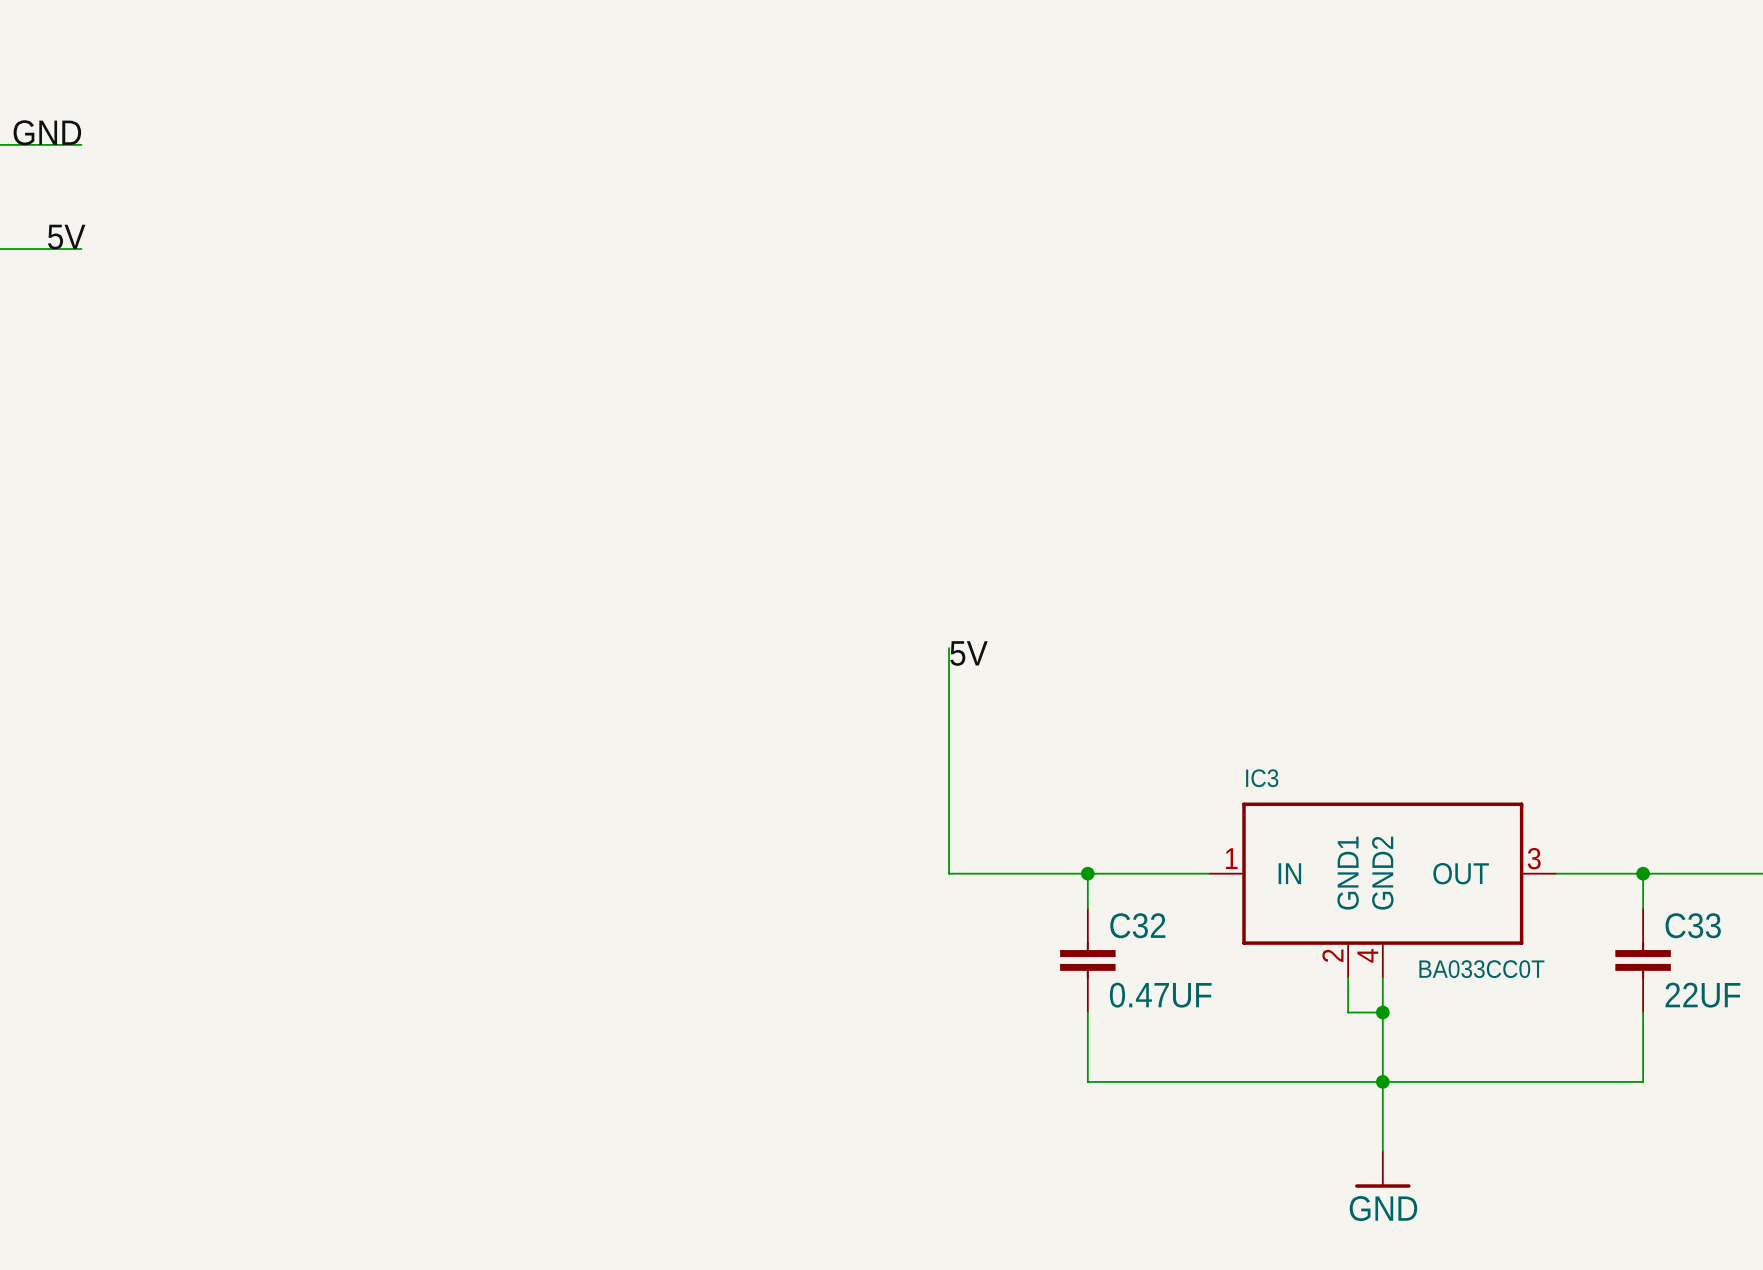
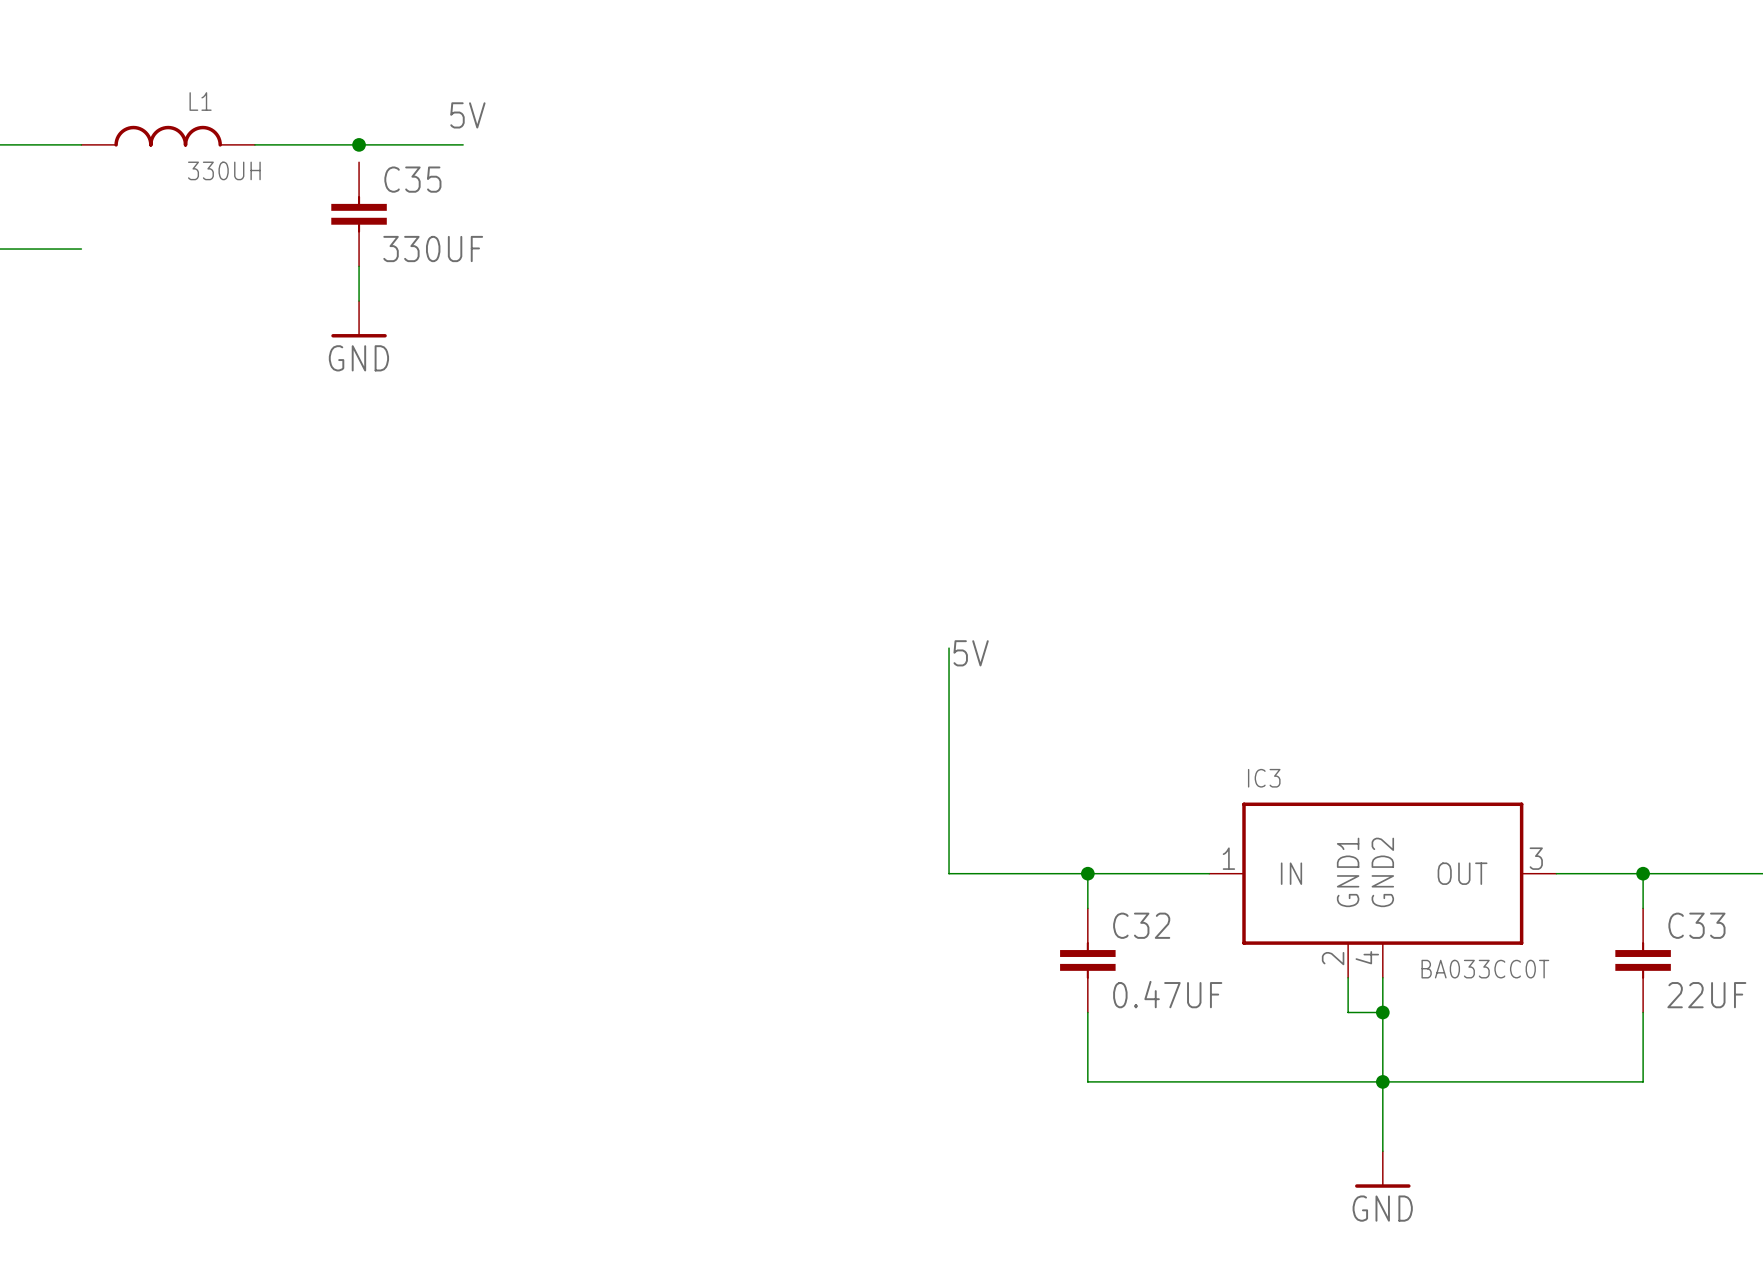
label: none -> 5V (467, 115)
label: GND (47, 132) -> none
L1: none -> 330UH (168, 136)
wire: none -> (254, 144) (463, 144)
junction: none -> (359, 144)
C35: none -> 330UF (359, 214)
label: 5V (66, 237) -> none
wire: none -> (359, 266) (359, 301)
power symbol: none -> GND (359, 319)

